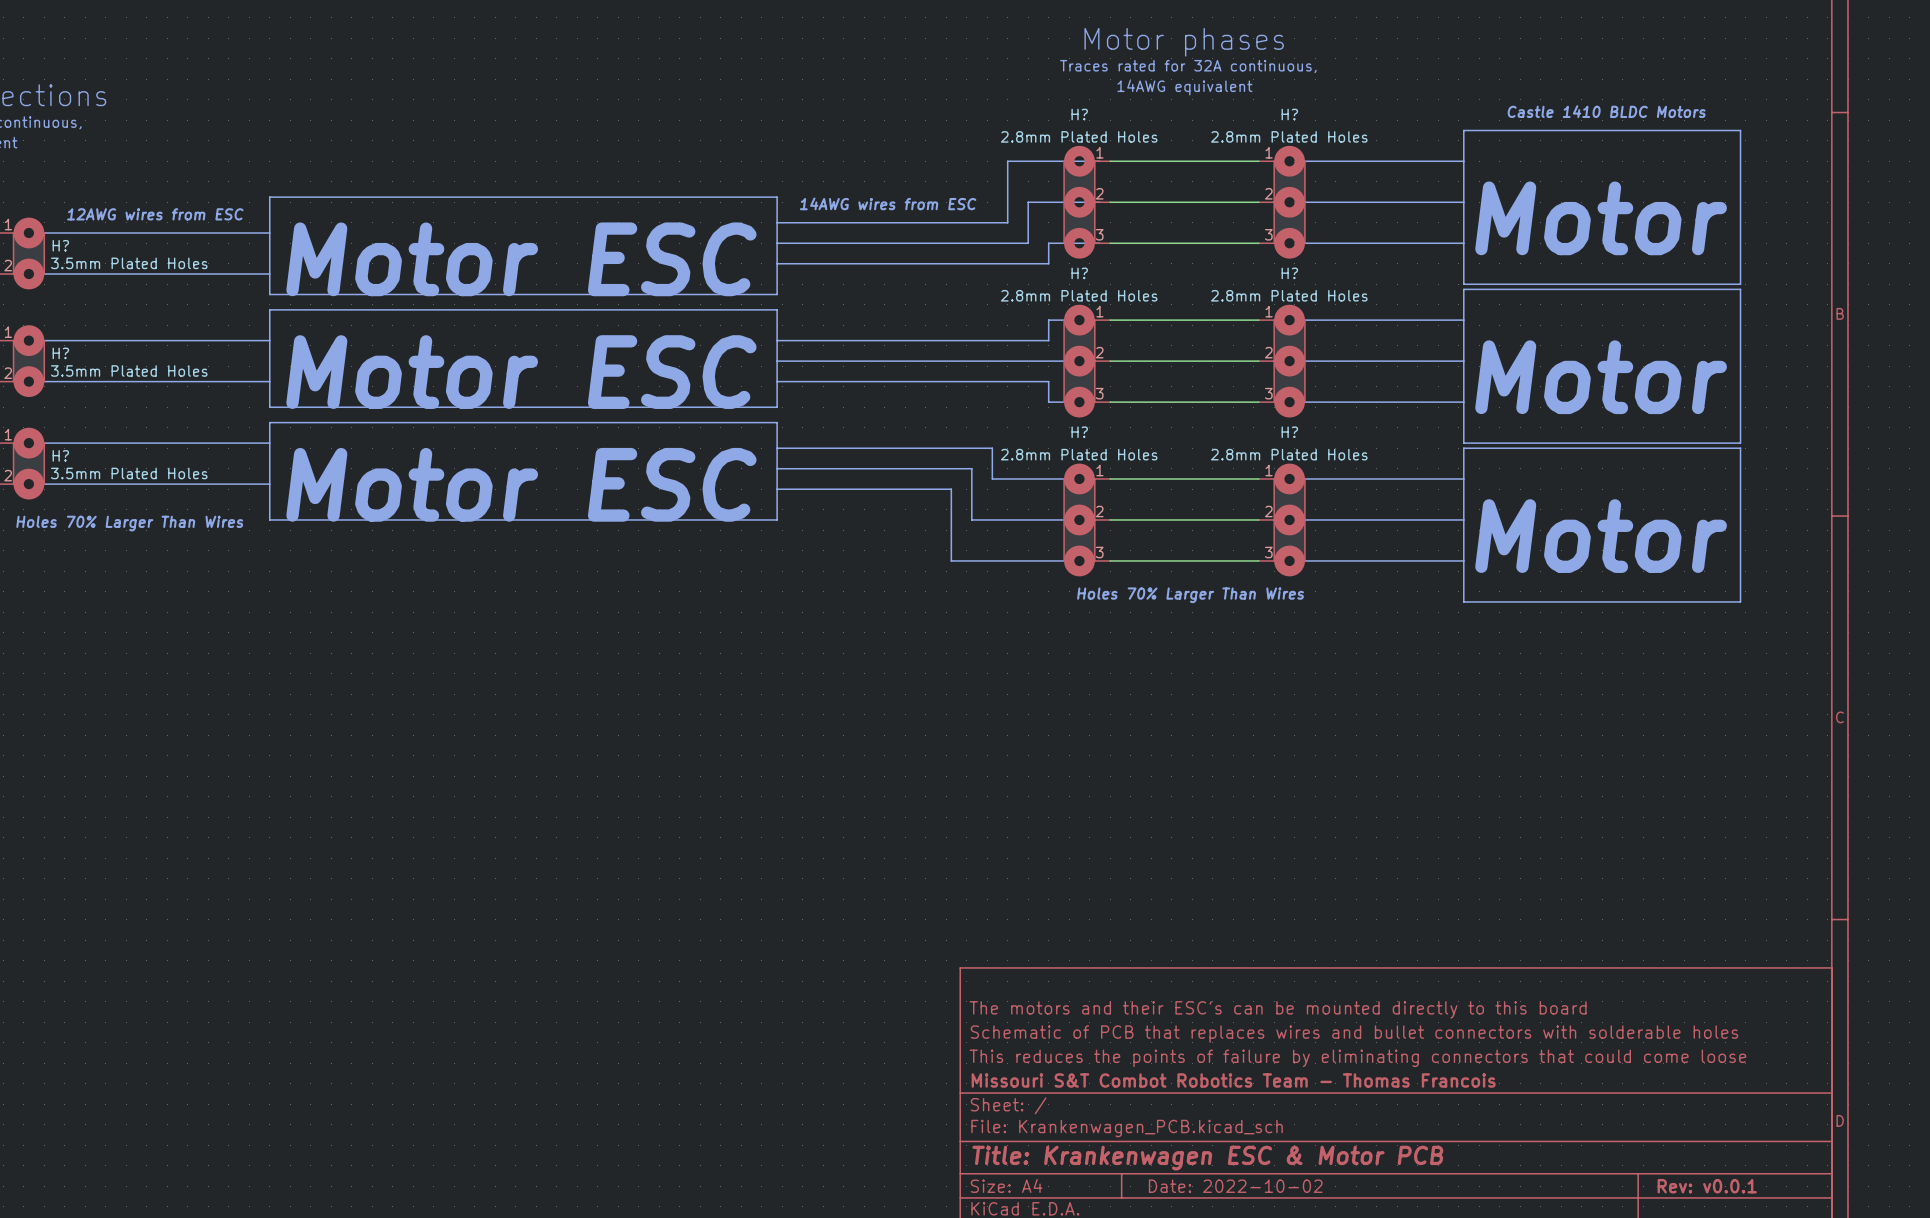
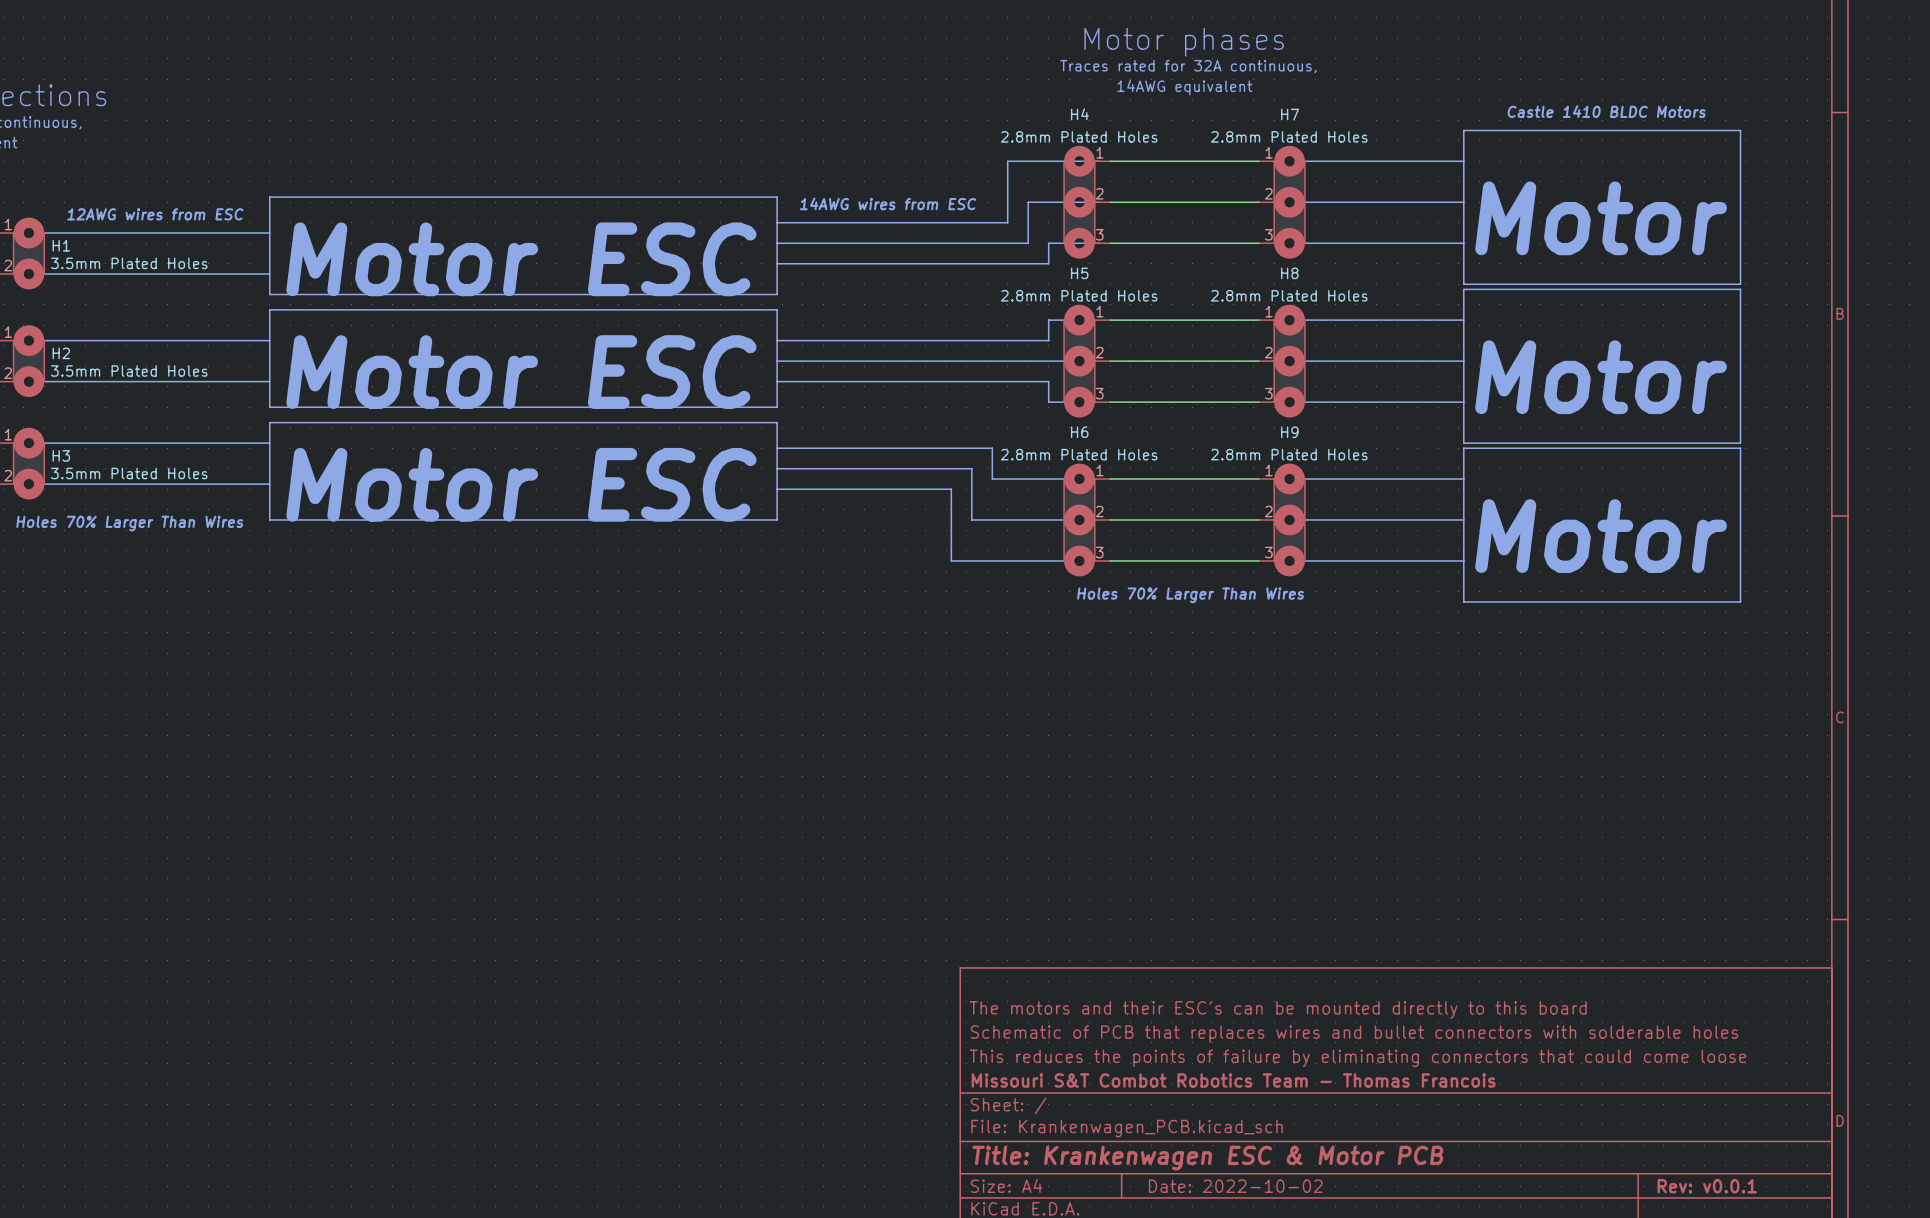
H? name: H? (1079, 114) -> H4 (1079, 114)
H? name: H? (1289, 114) -> H7 (1290, 114)
H? name: H? (60, 245) -> H1 (61, 245)
H? name: H? (1079, 273) -> H5 (1079, 273)
H? name: H? (1289, 273) -> H8 (1289, 273)
H? name: H? (60, 353) -> H2 (61, 353)
H? name: H? (1079, 432) -> H6 (1079, 432)
H? name: H? (1289, 432) -> H9 (1289, 432)
H? name: H? (60, 455) -> H3 (61, 455)

